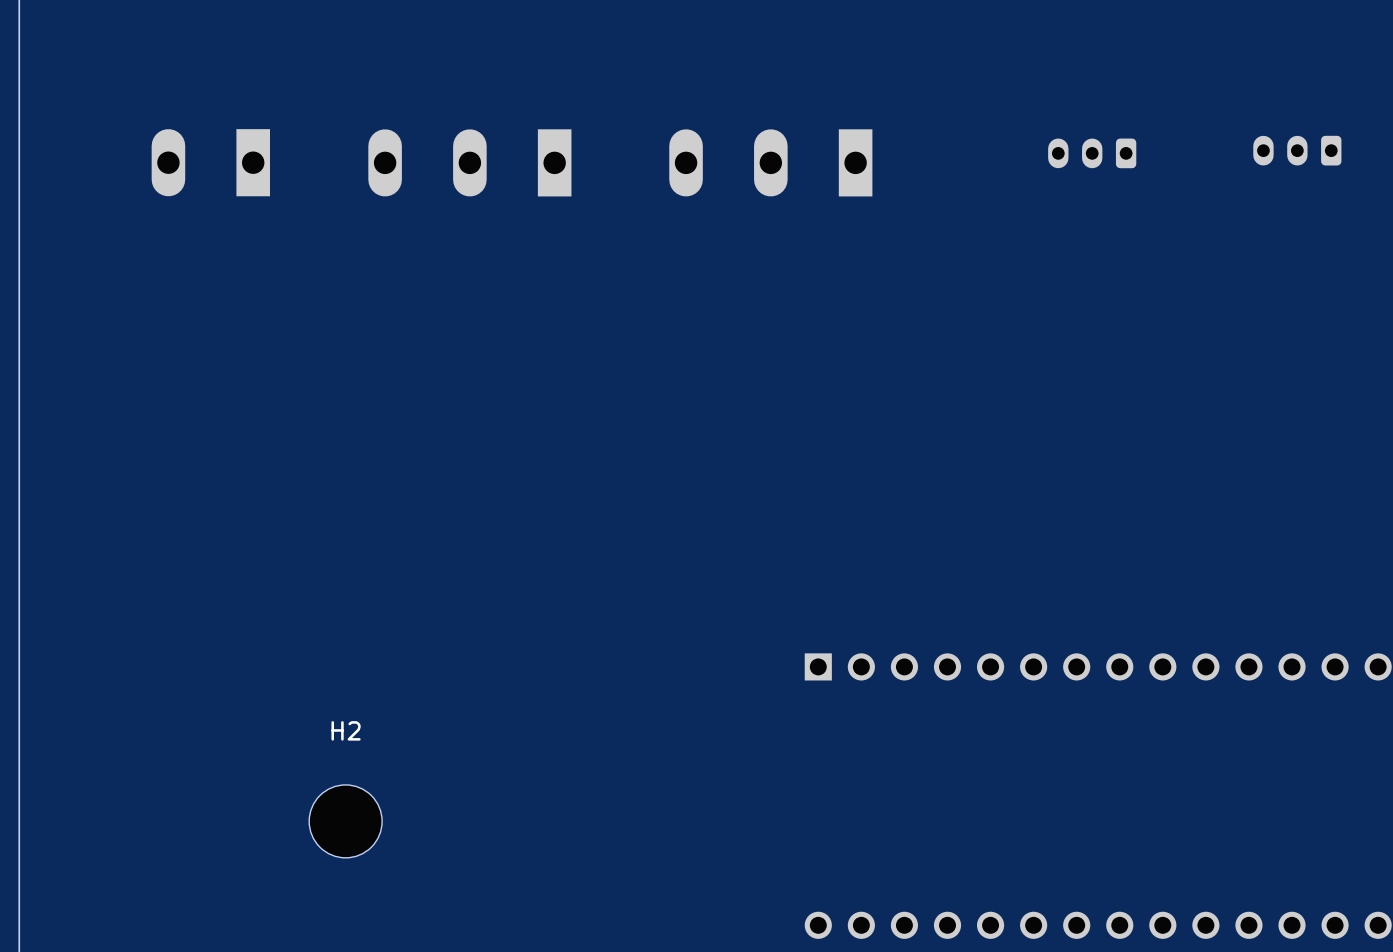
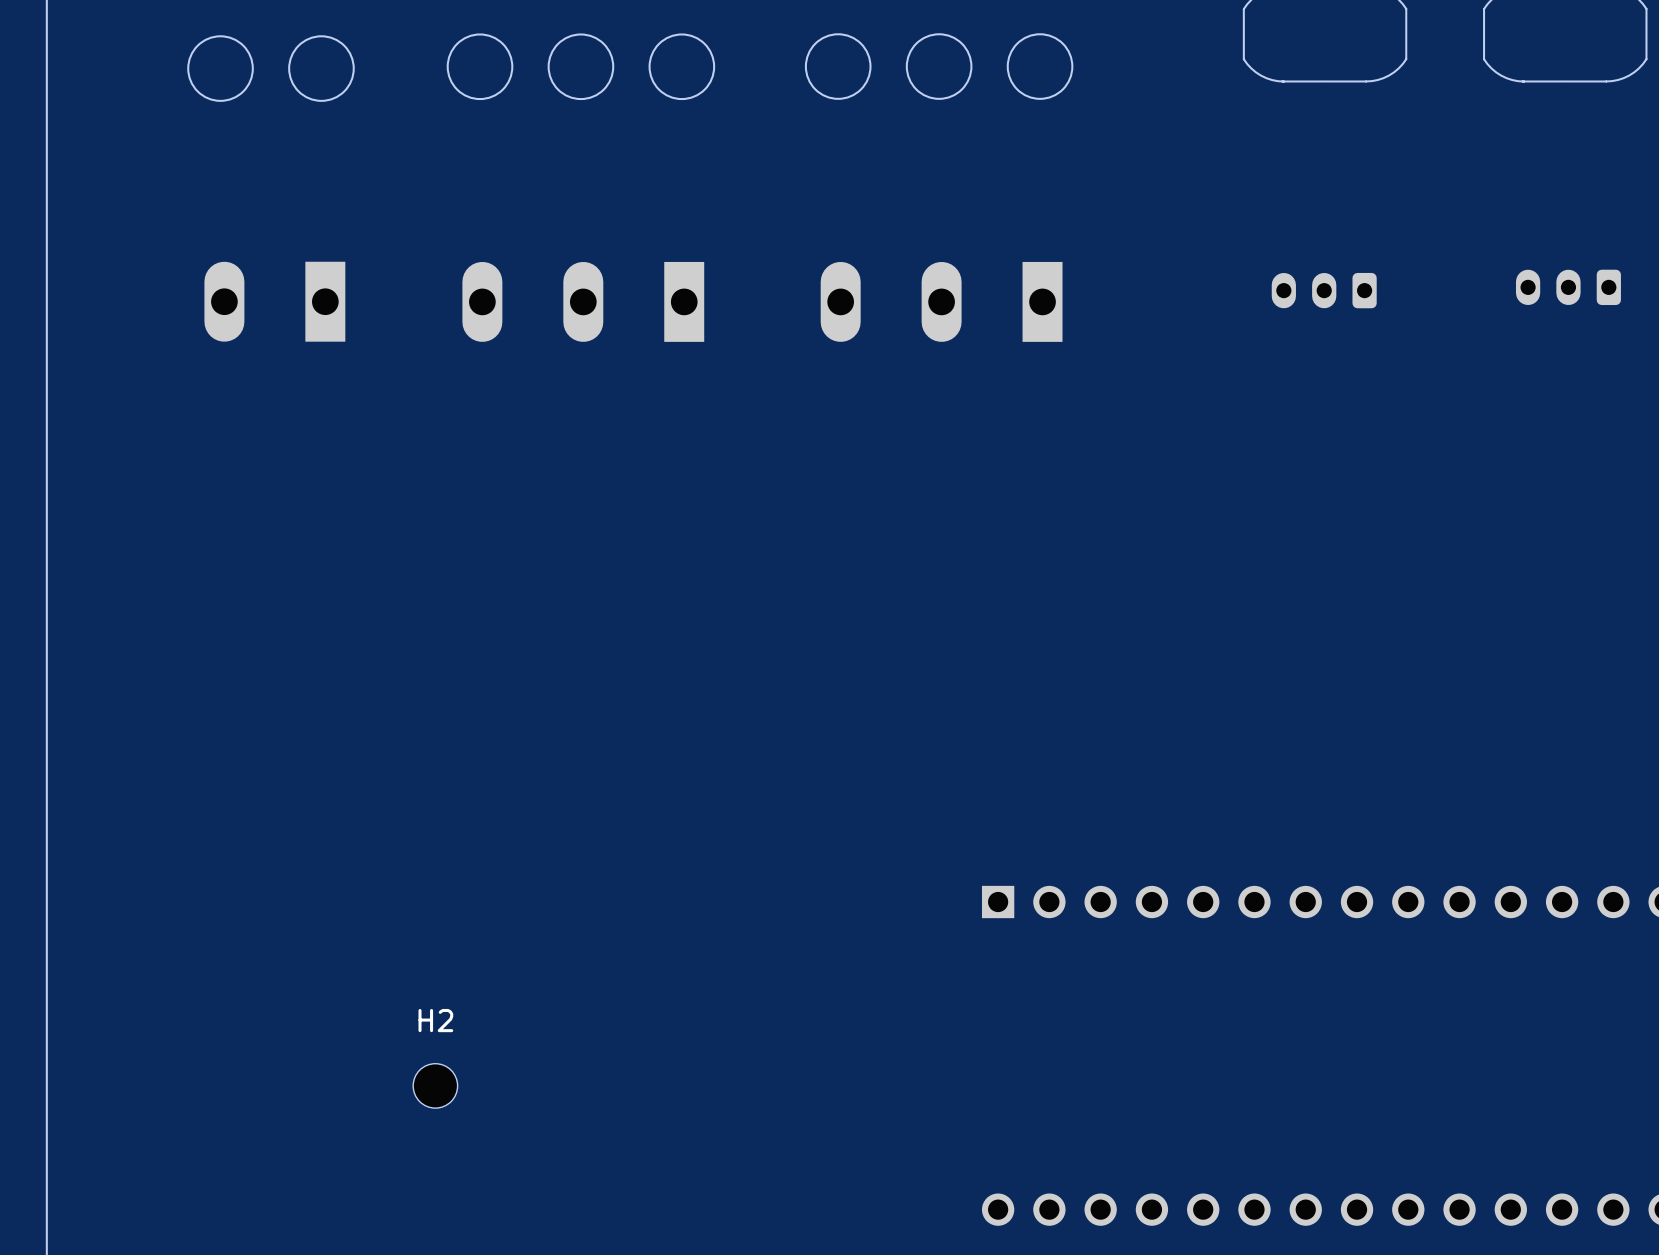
H2 name position: H2 (346, 730) -> H2 (435, 1020)
H2 footprint: [309, 784, 383, 858] -> [413, 1063, 458, 1109]

